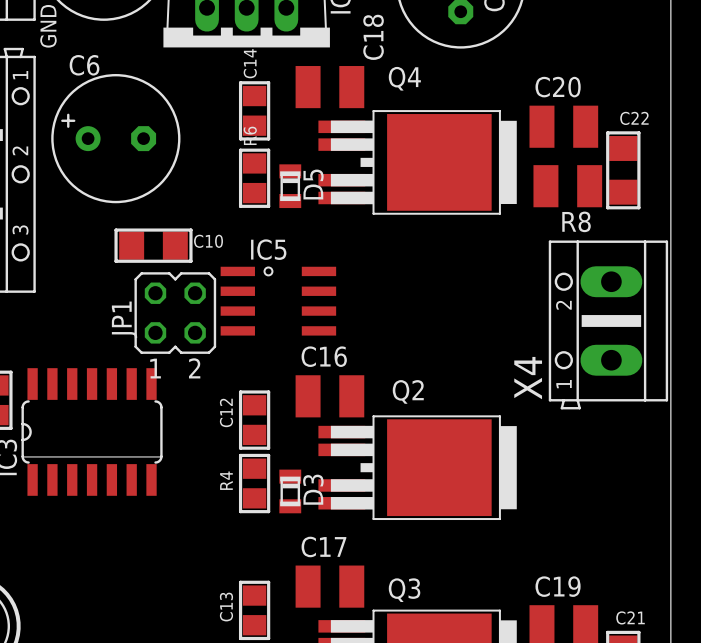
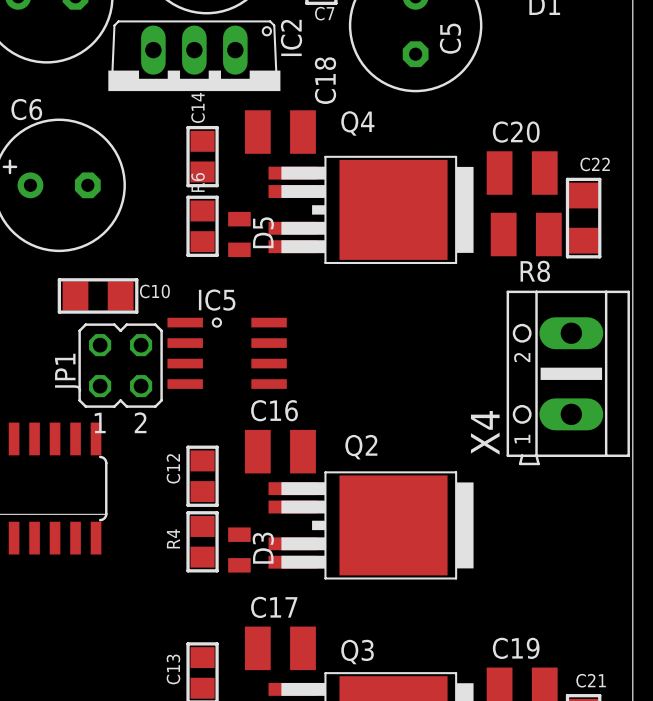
D5 footprint: [279, 164, 302, 209] -> [228, 211, 251, 258]
D3 footprint: [279, 469, 302, 514] -> [228, 527, 251, 573]

